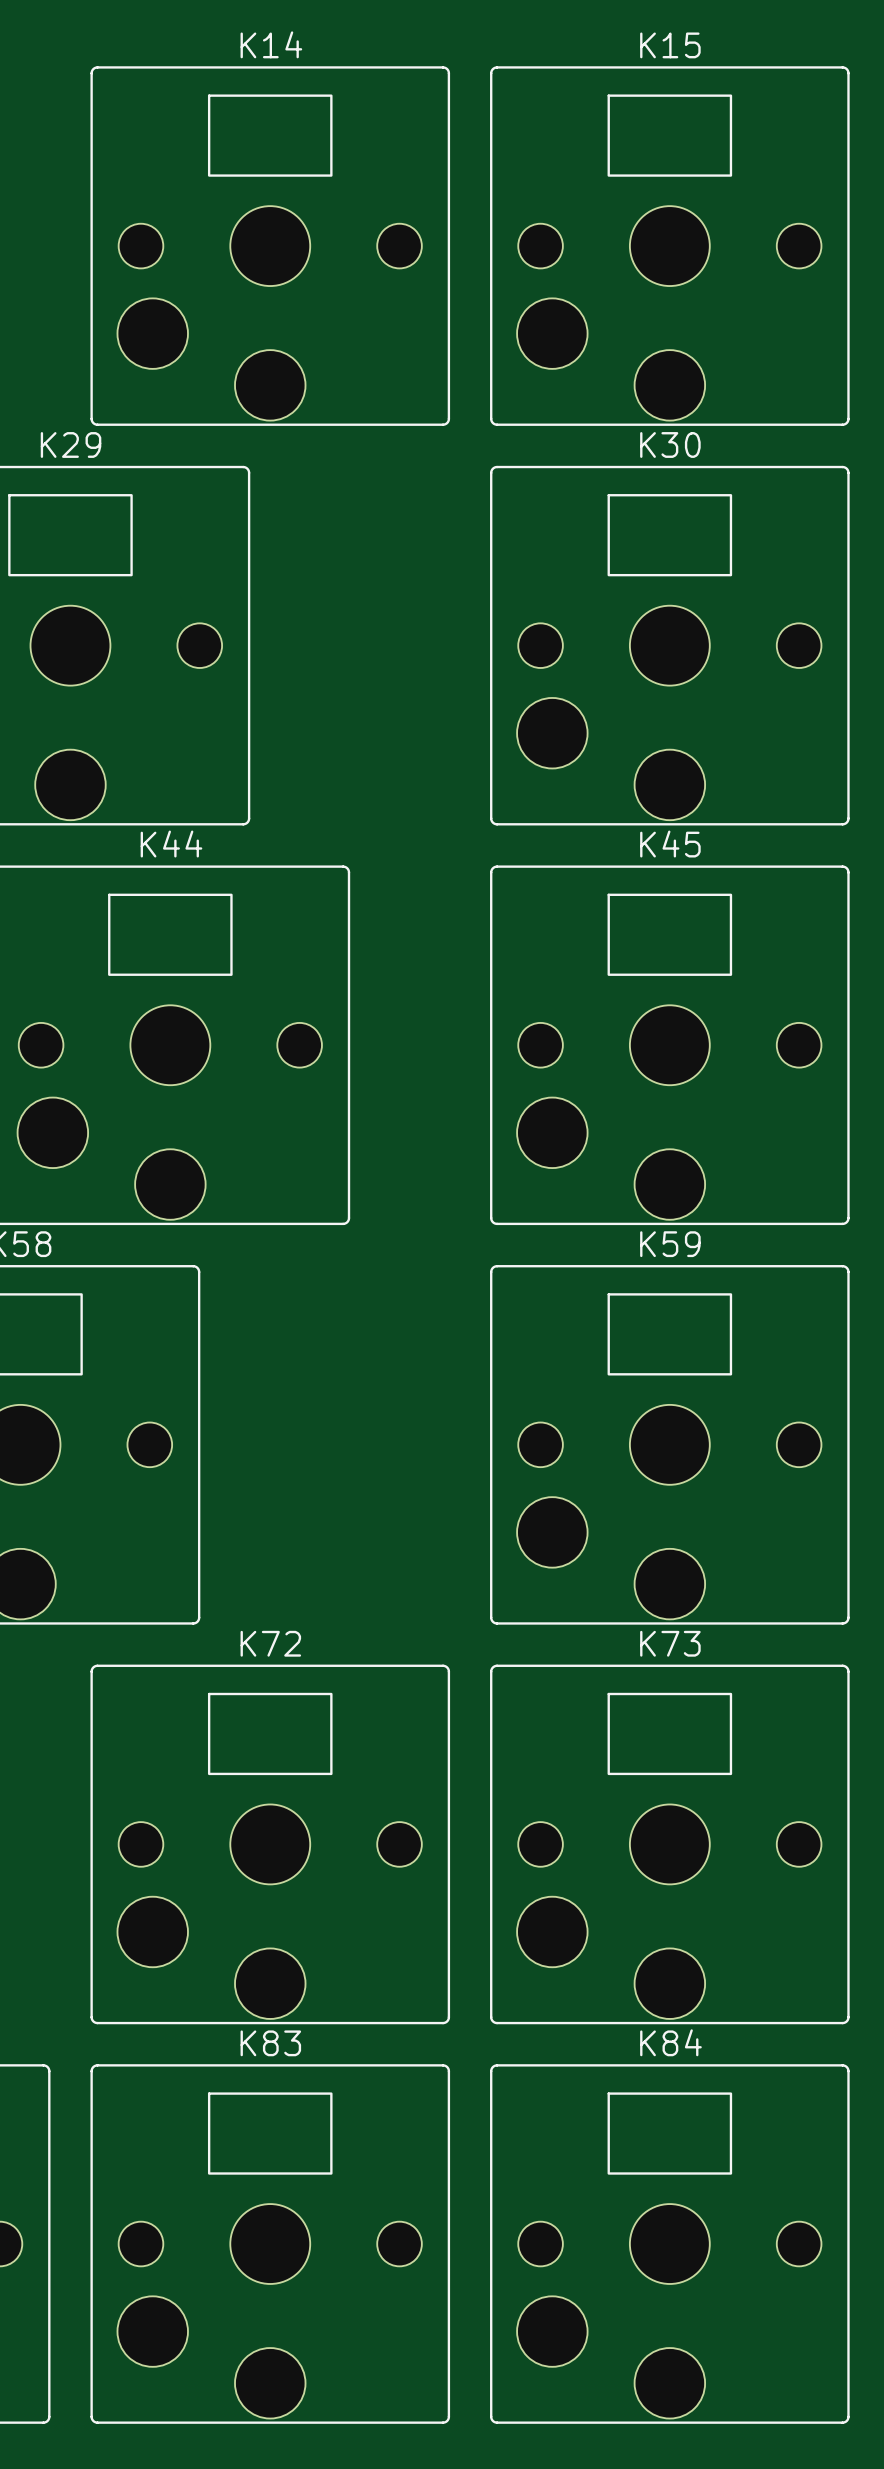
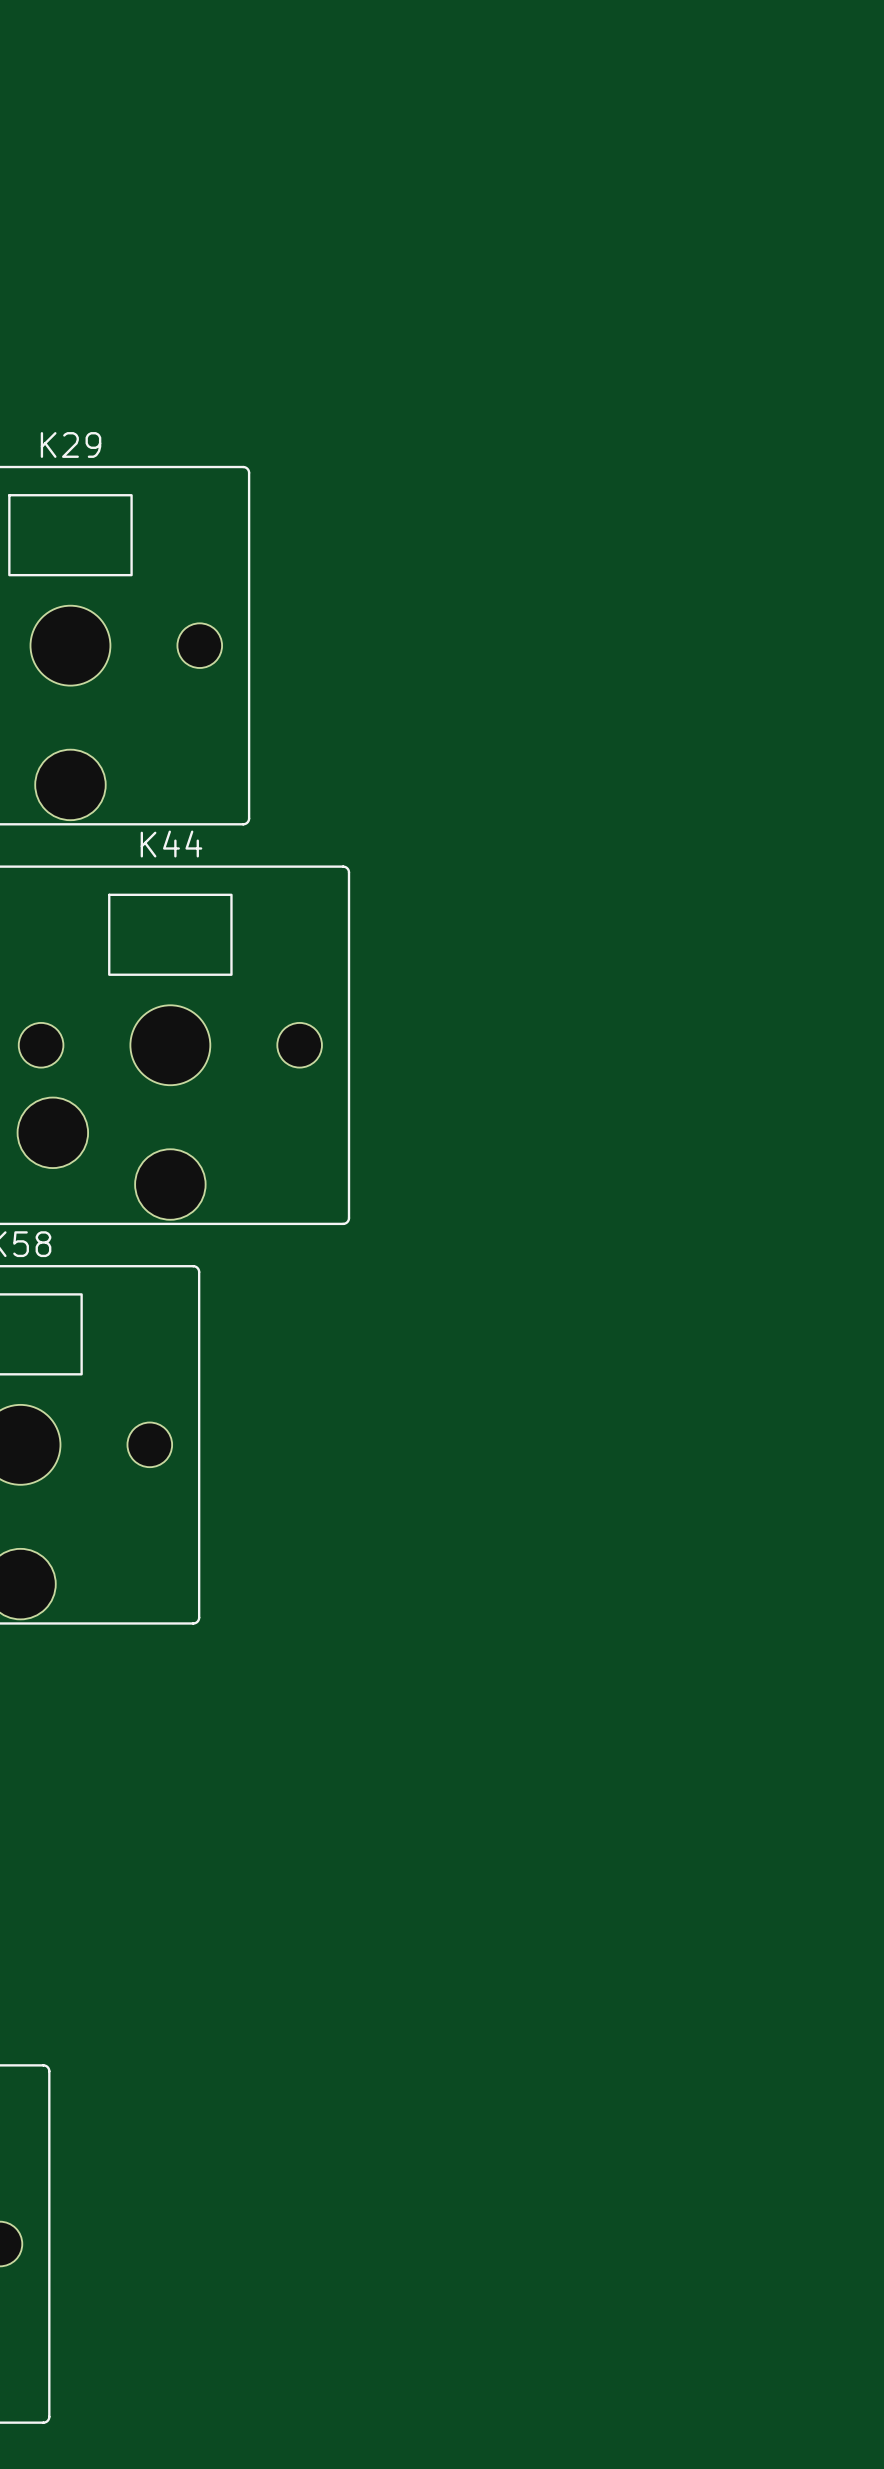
K14: (270, 246) -> none
K15: (669, 246) -> none
K30: (669, 645) -> none
K45: (669, 1045) -> none
K59: (669, 1444) -> none
K72: (270, 1844) -> none
K73: (669, 1844) -> none
K83: (270, 2244) -> none
K84: (669, 2244) -> none

